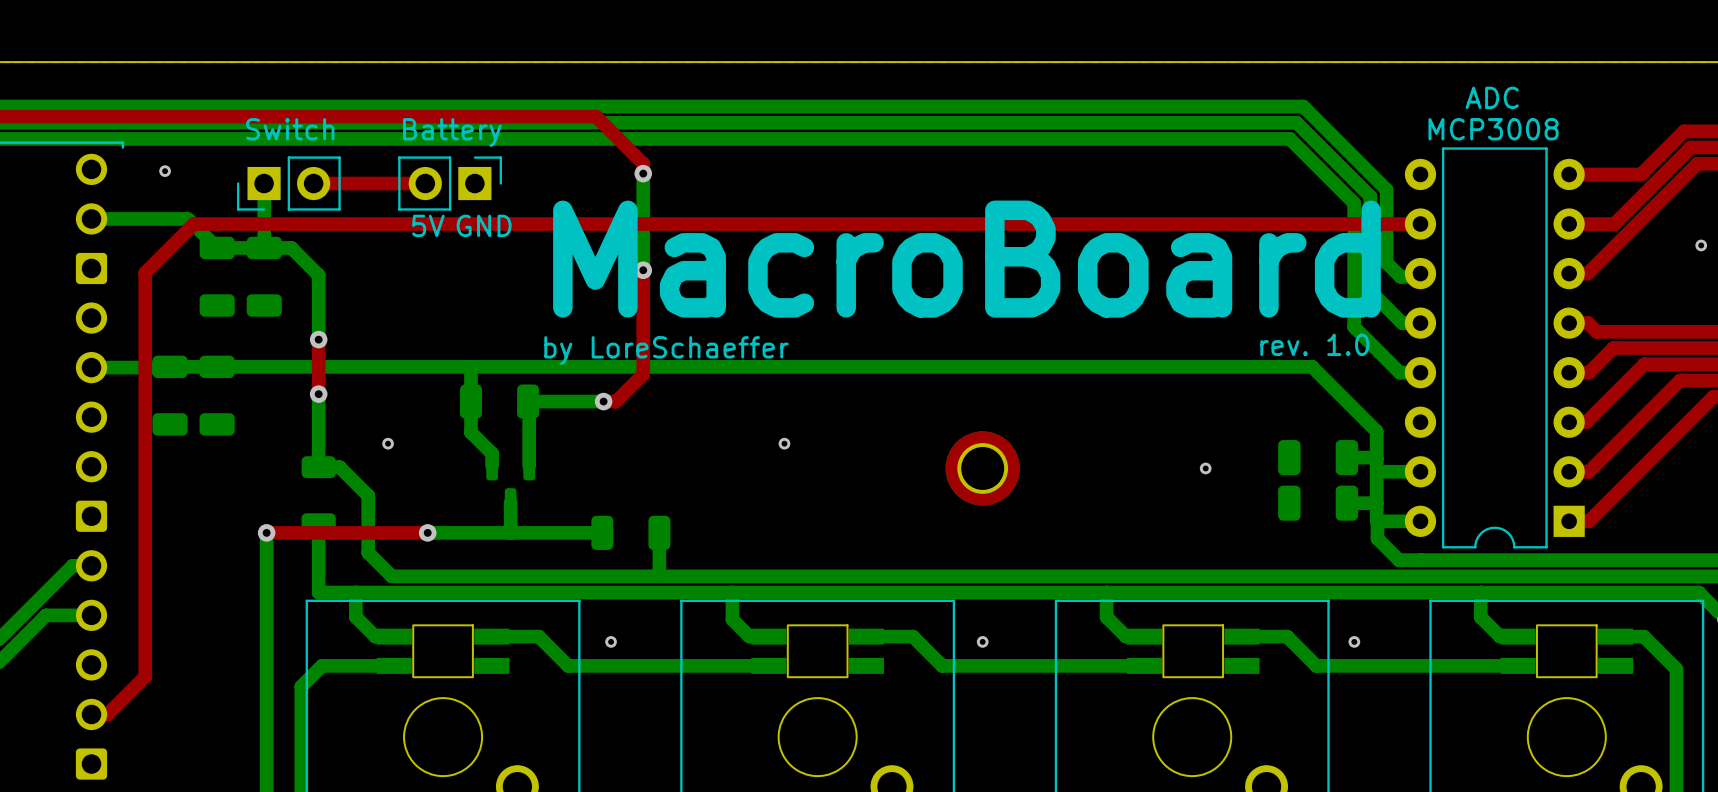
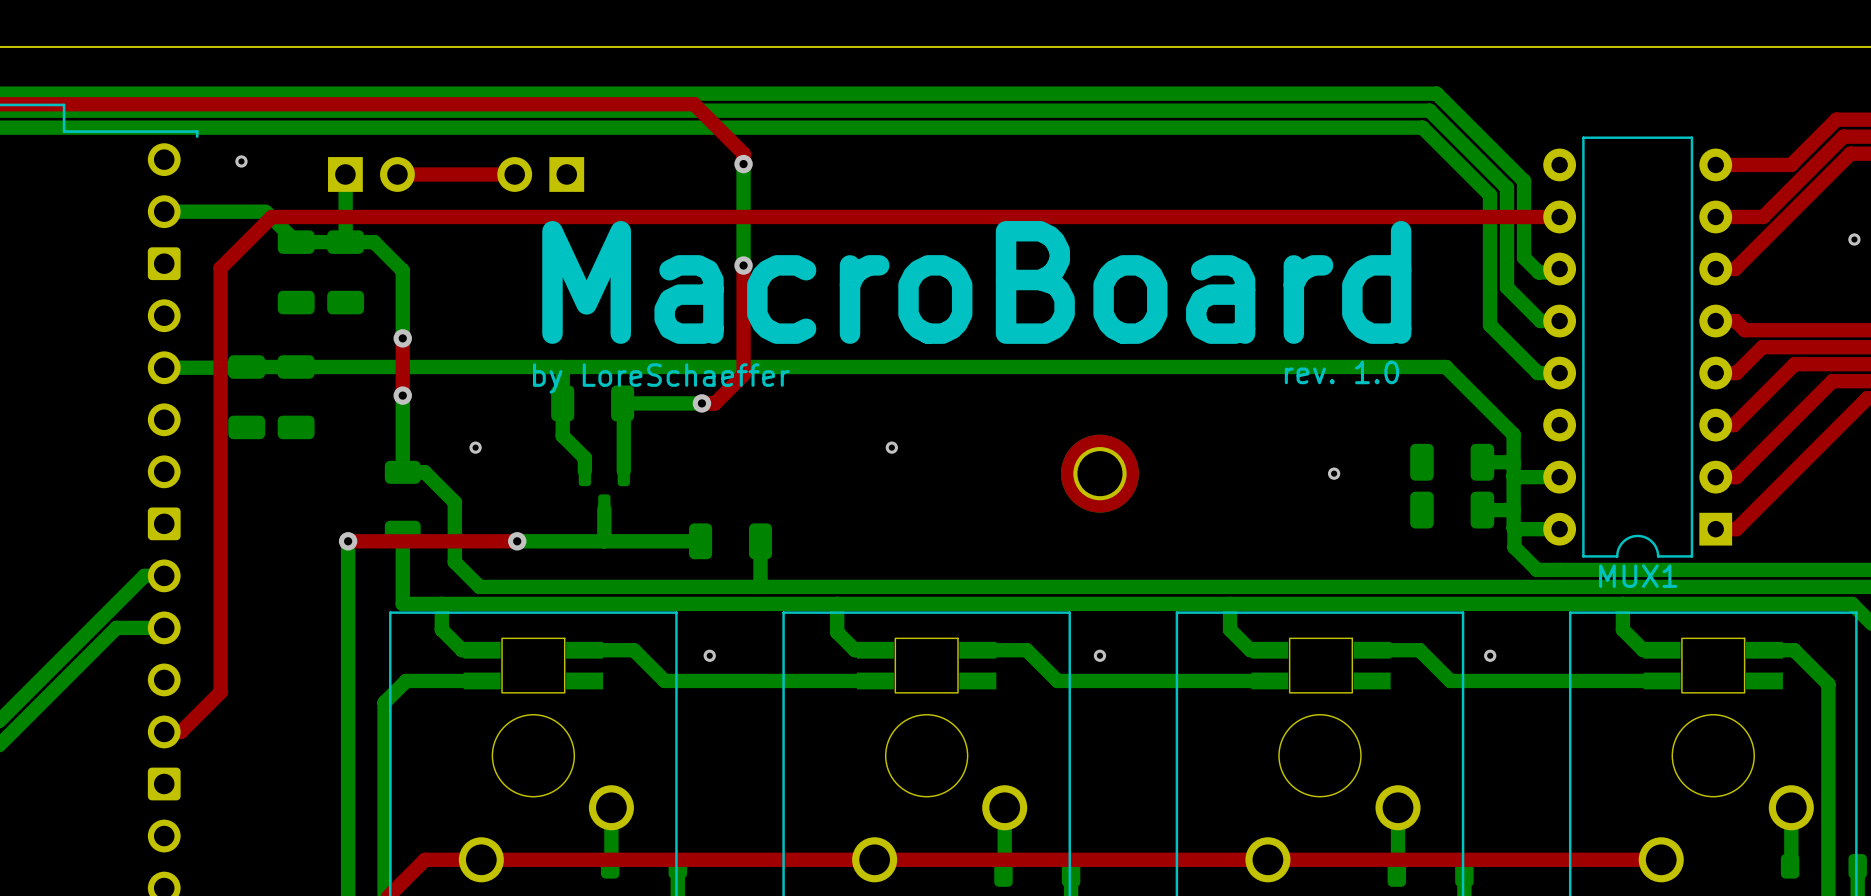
text: ADC (1492, 97) -> none
text: Switch (290, 129) -> none
text: MCP3008 (1493, 129) -> none
text: Battery (452, 132) -> none
part side: top (288, 183) -> bottom (371, 174)
part side: top (450, 183) -> bottom (540, 174)
text: 5V (428, 225) -> none
text: GND (484, 225) -> none
text position: MacroBoard (966, 259) -> MacroBoard (976, 282)
text position: rev. 1.0 (1314, 344) -> rev. 1.0 (1341, 372)
text position: by LoreSchaeffer (666, 350) -> by LoreSchaeffer (661, 378)
MUX1 name: none -> MUX1 (1638, 576)

